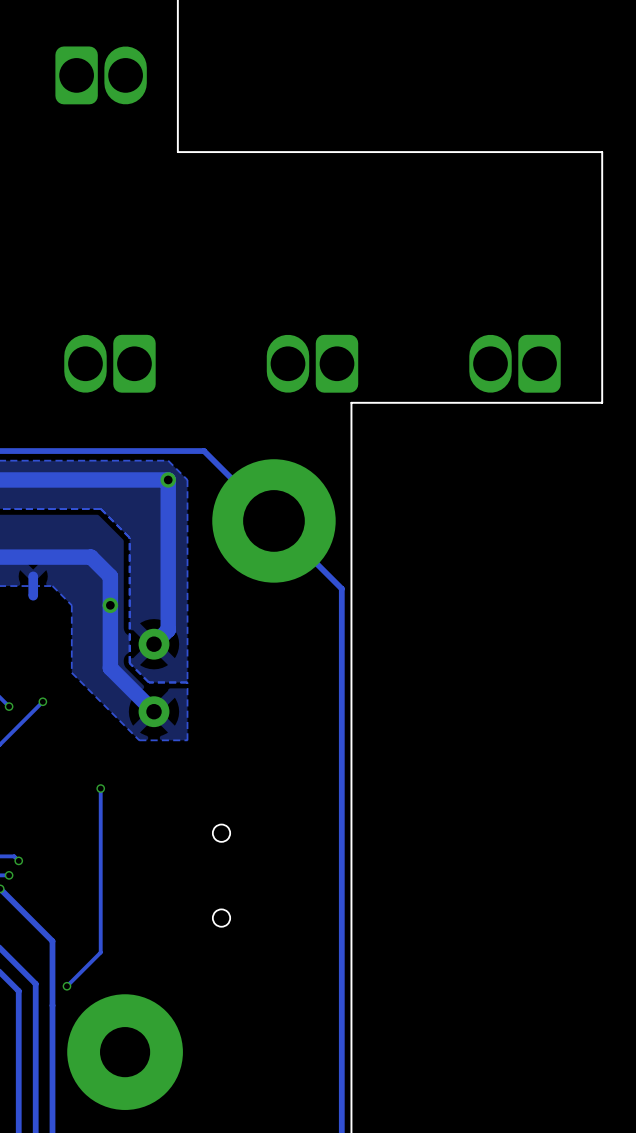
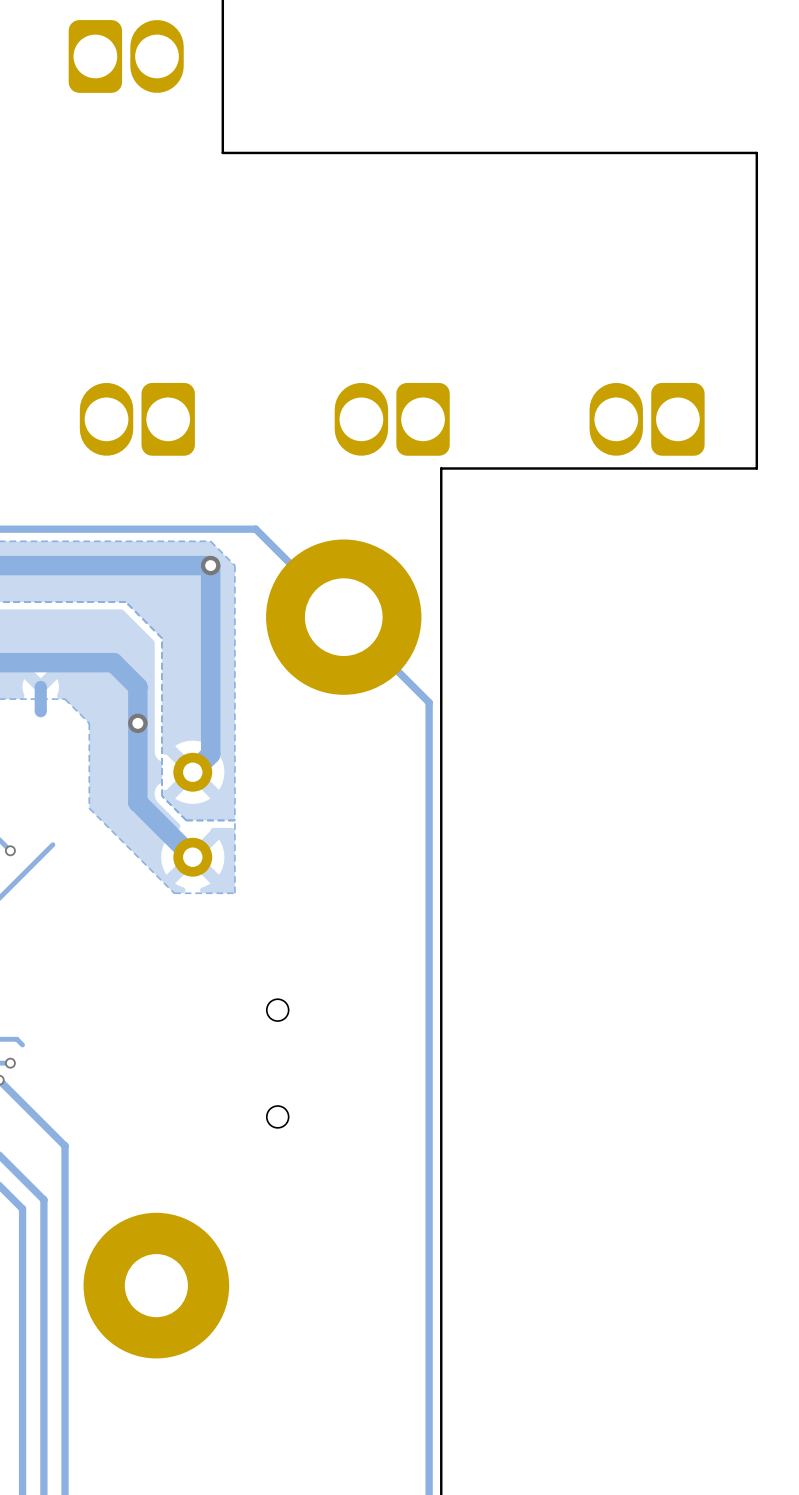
via: (42, 701) -> none
track: (100, 788) (100, 952) (66, 986) -> none
via: (100, 788) -> none
via: (18, 860) -> none
via: (66, 986) -> none

